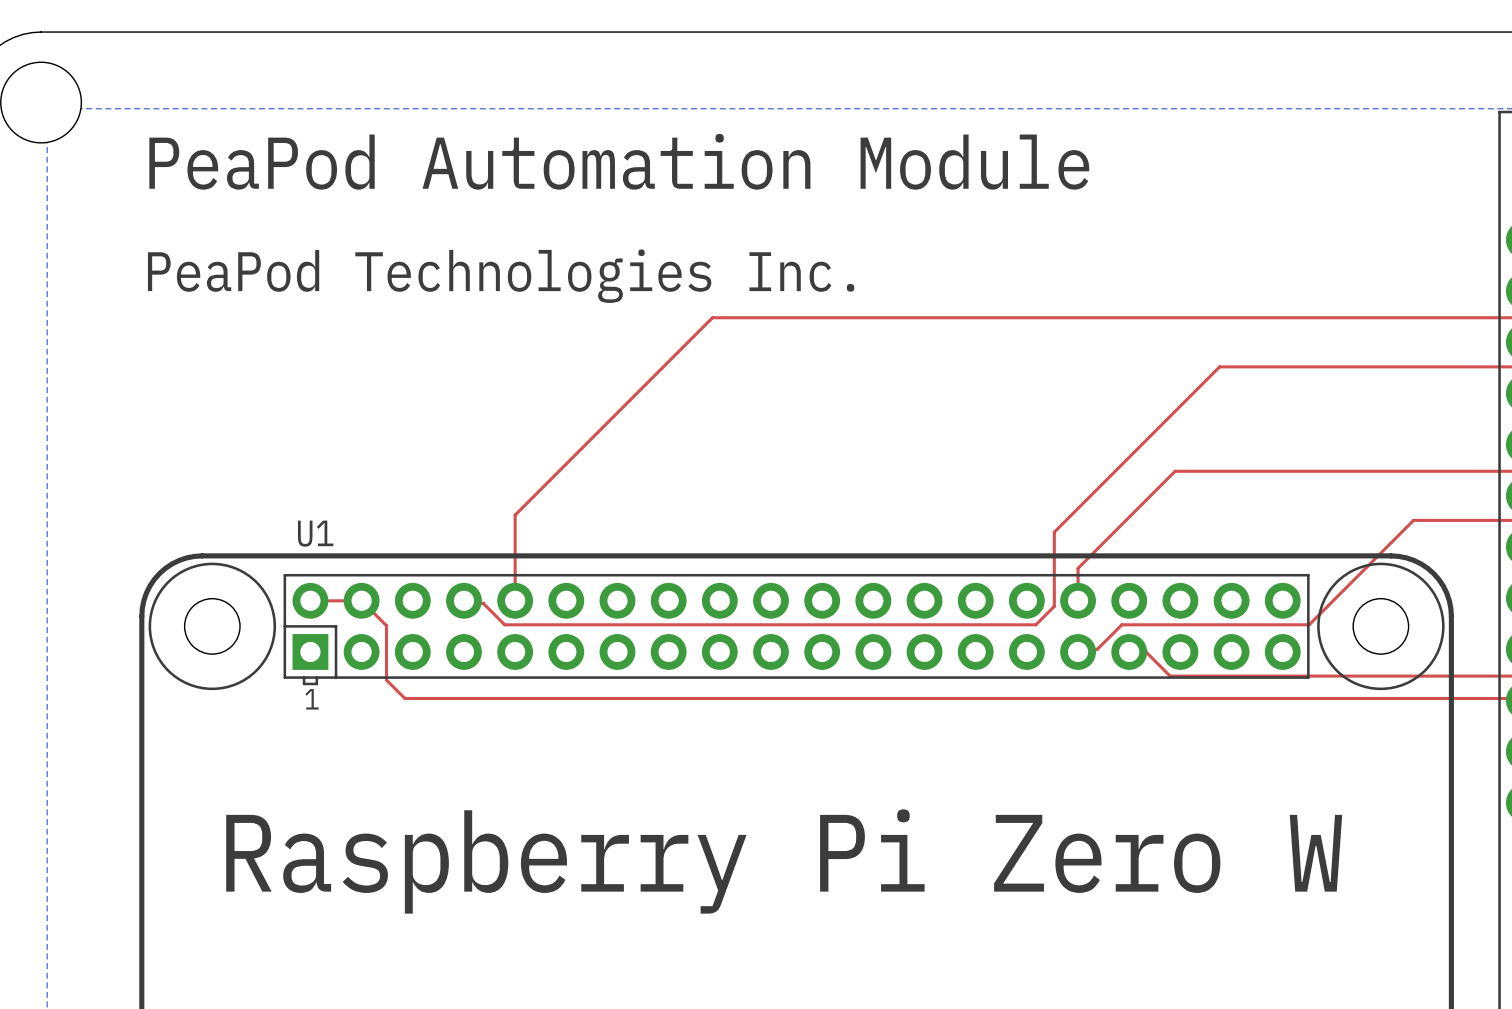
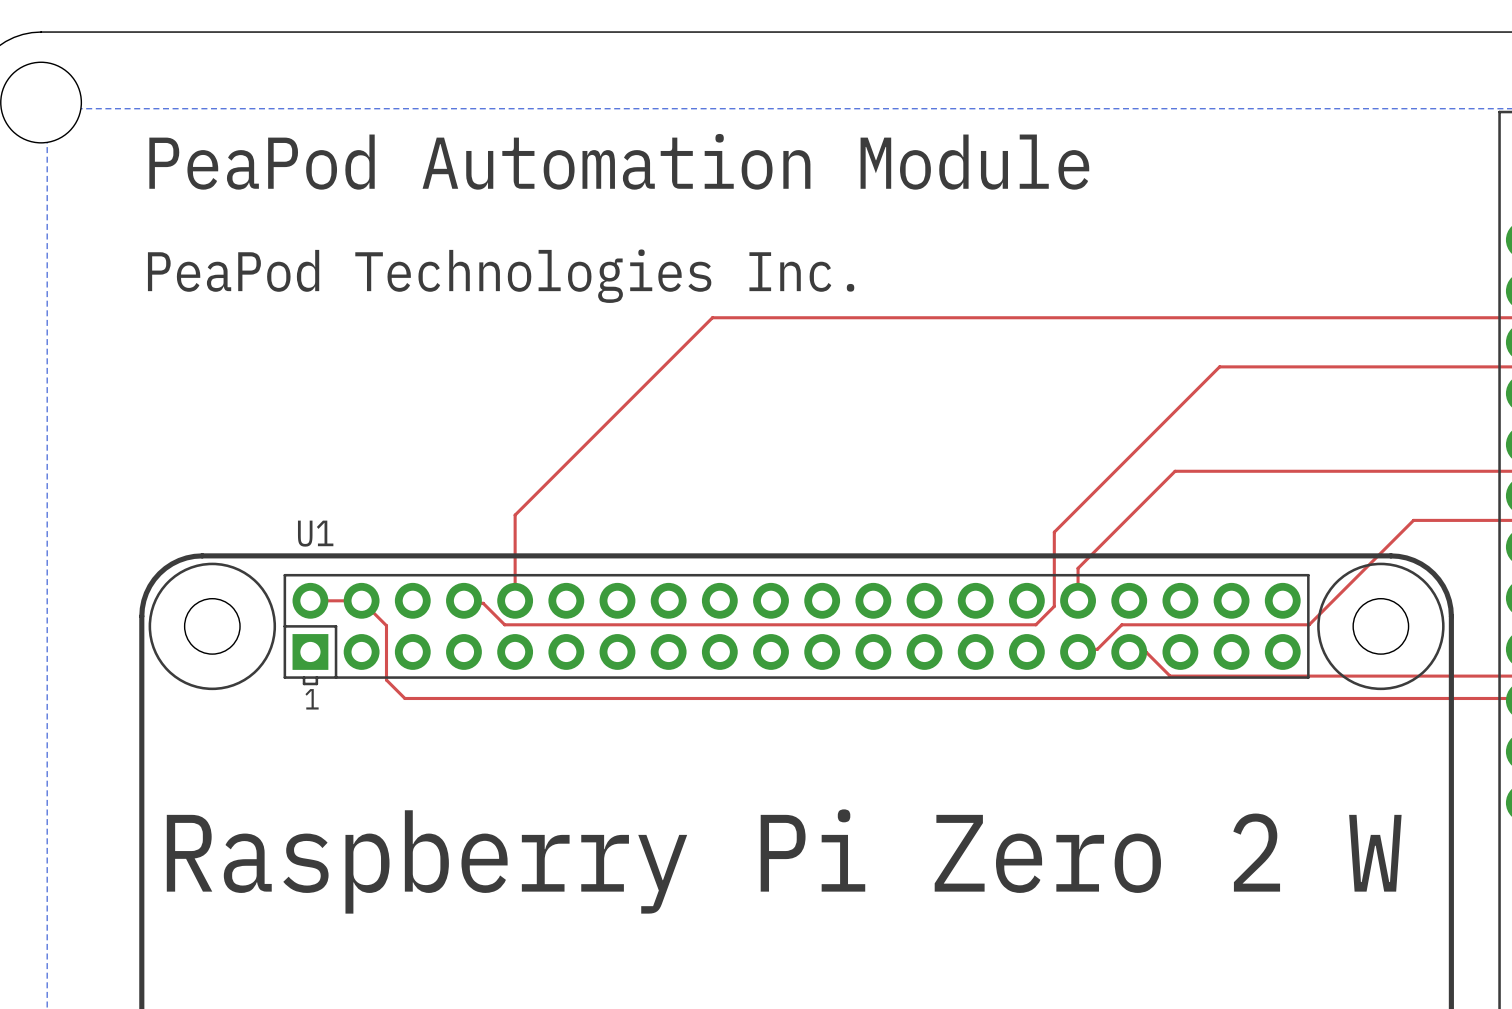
U1 text: Raspberry Pi Zero W (784, 861) -> Raspberry Pi Zero 2 W (784, 861)

